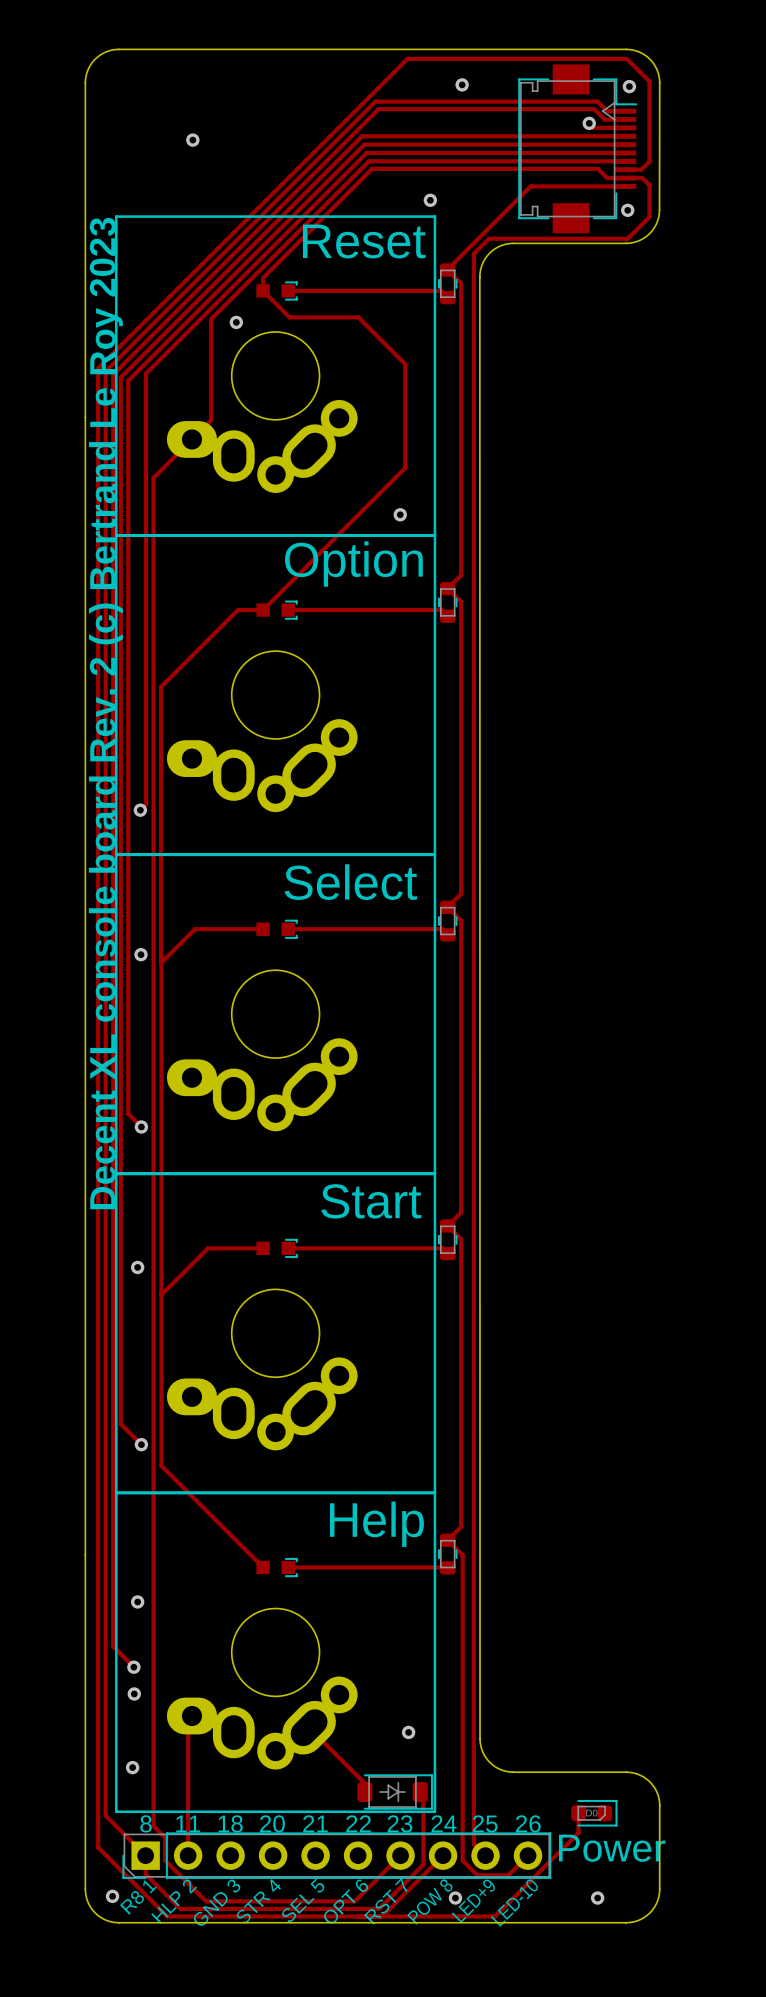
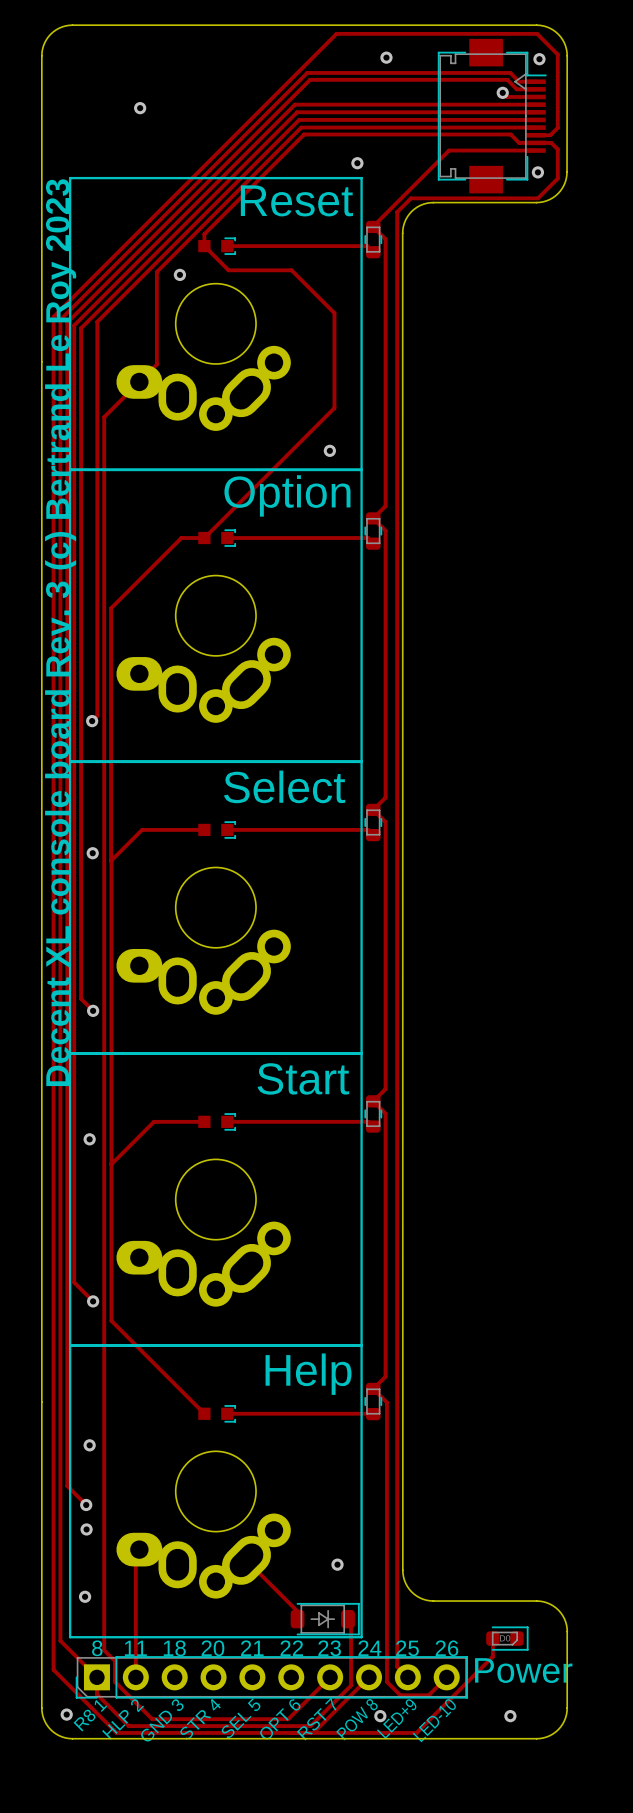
text: Decent XL console board Rev. 2 (c) Bertrand Le Roy 2023 (105, 713) -> Decent XL console board Rev. 3 (c) Bertrand Le Roy 2023 (60, 632)

